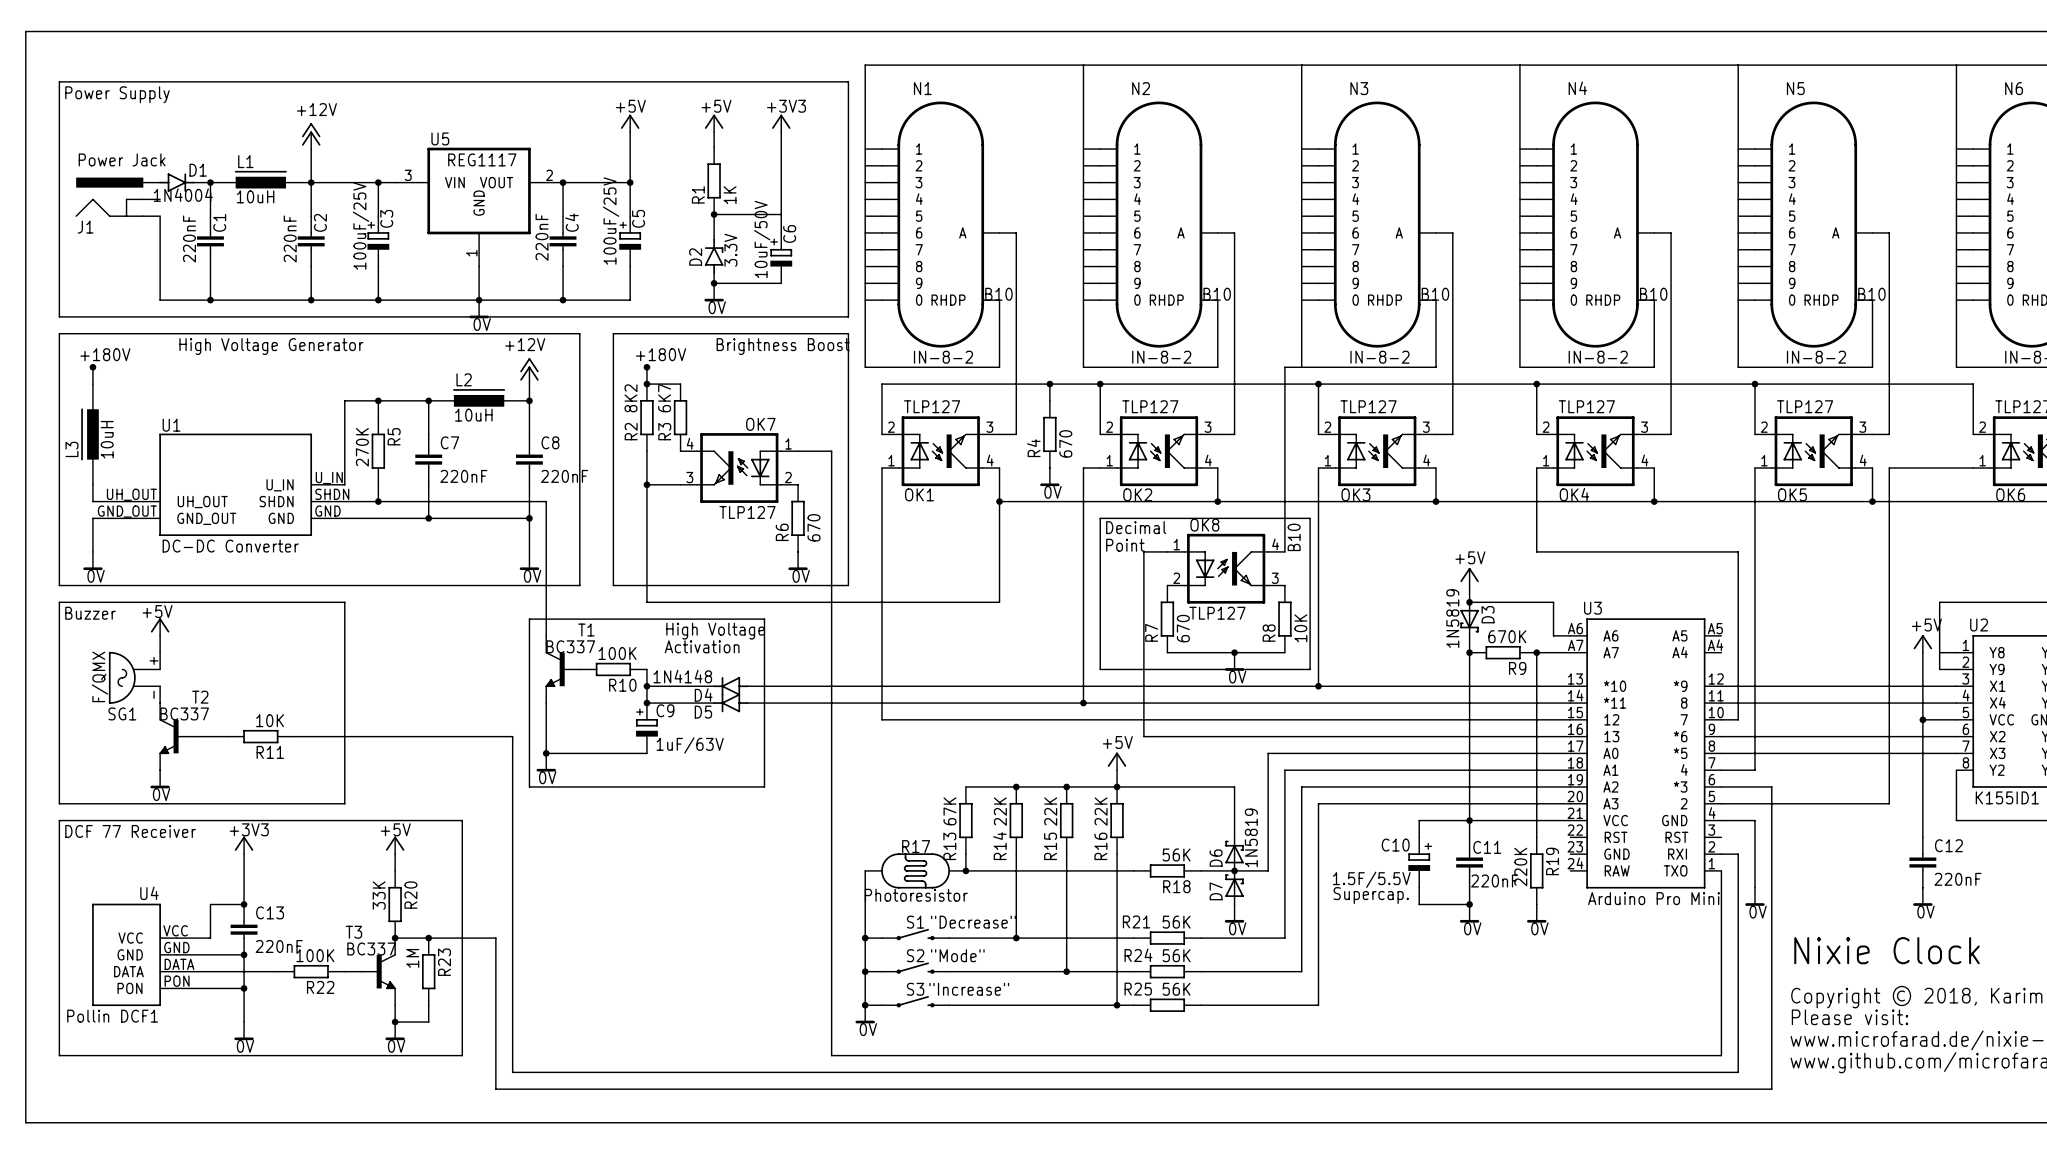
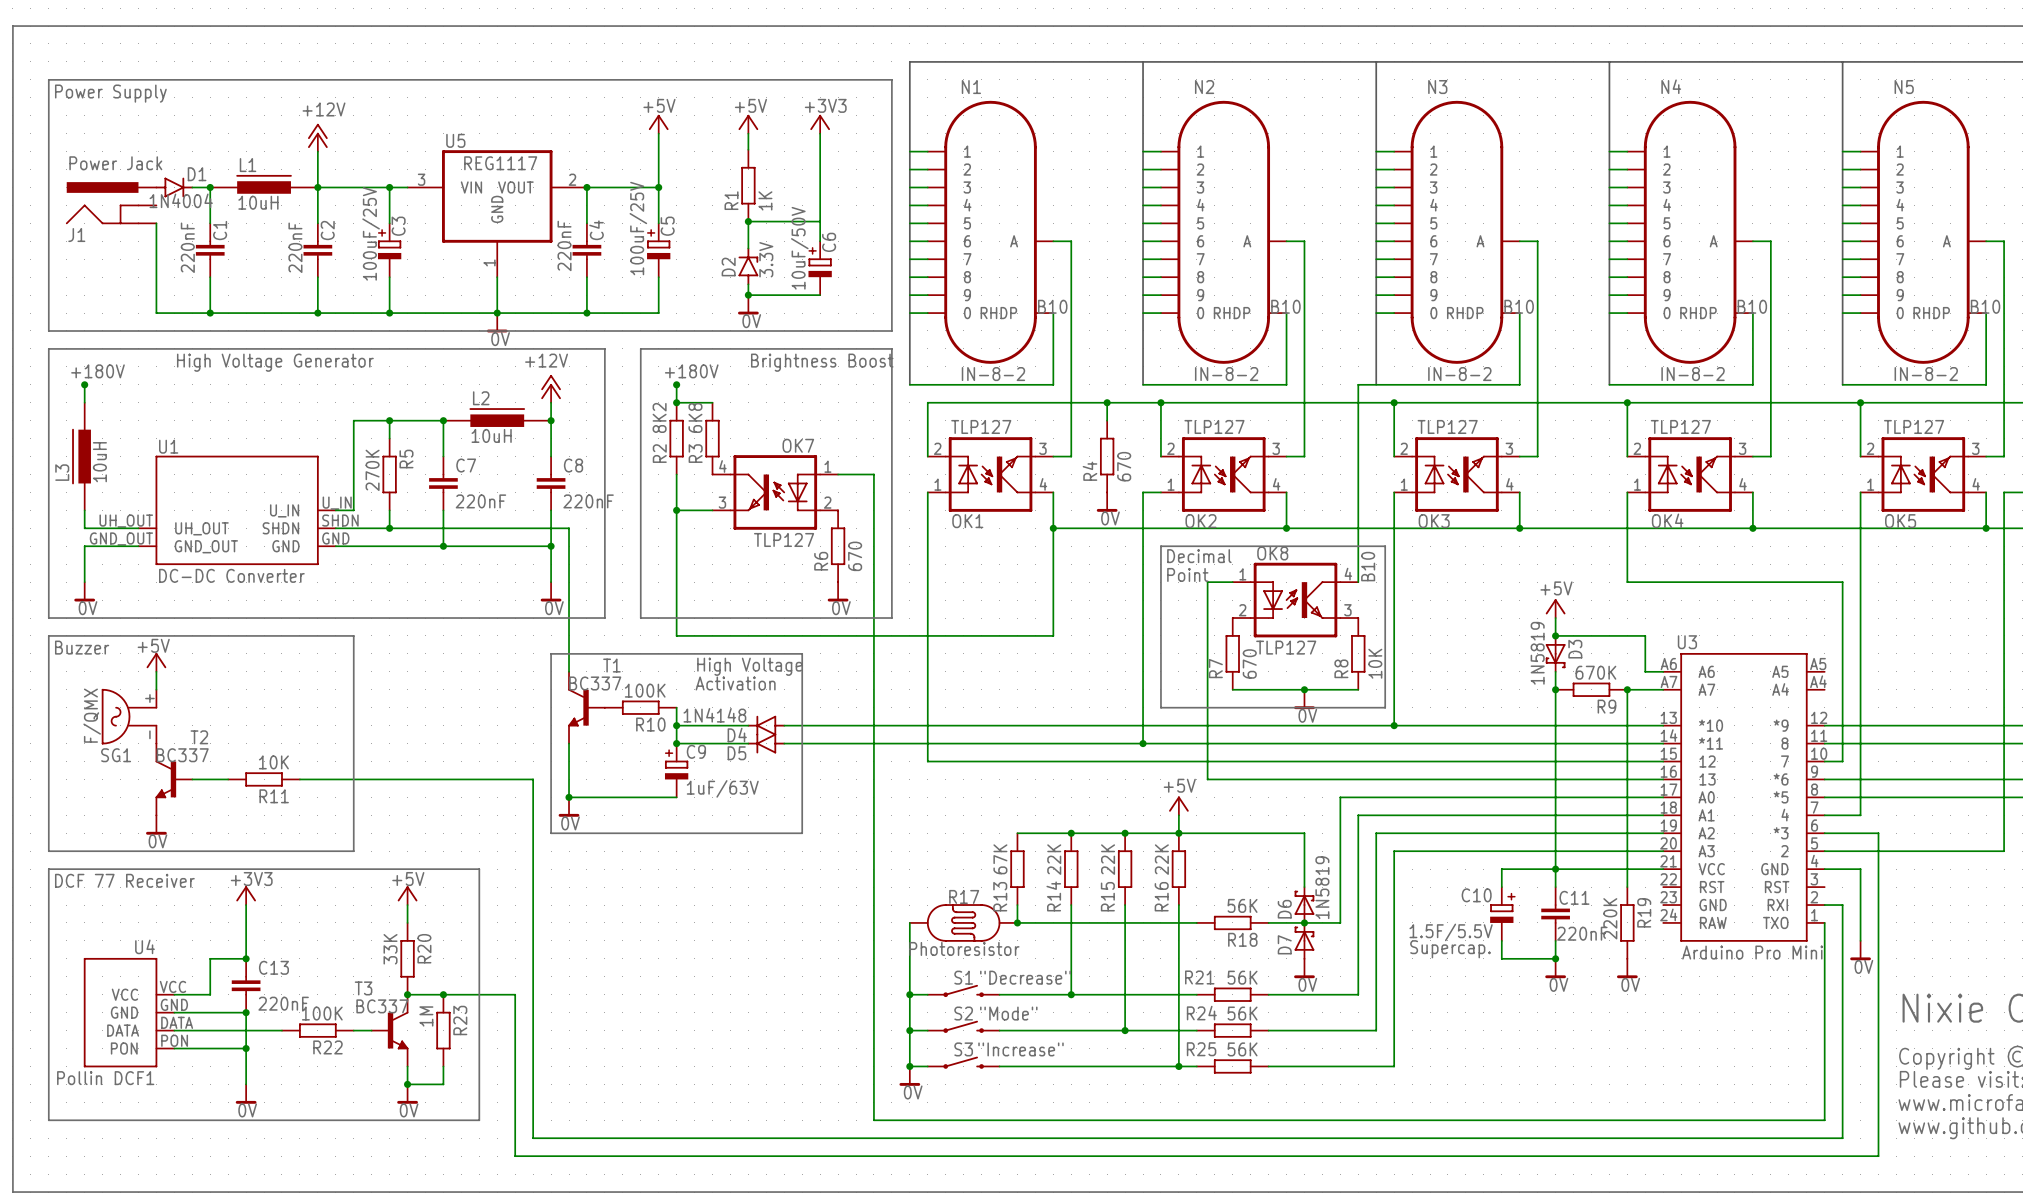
R3 value: 6K7 (664, 398) -> 6K8 (695, 417)

